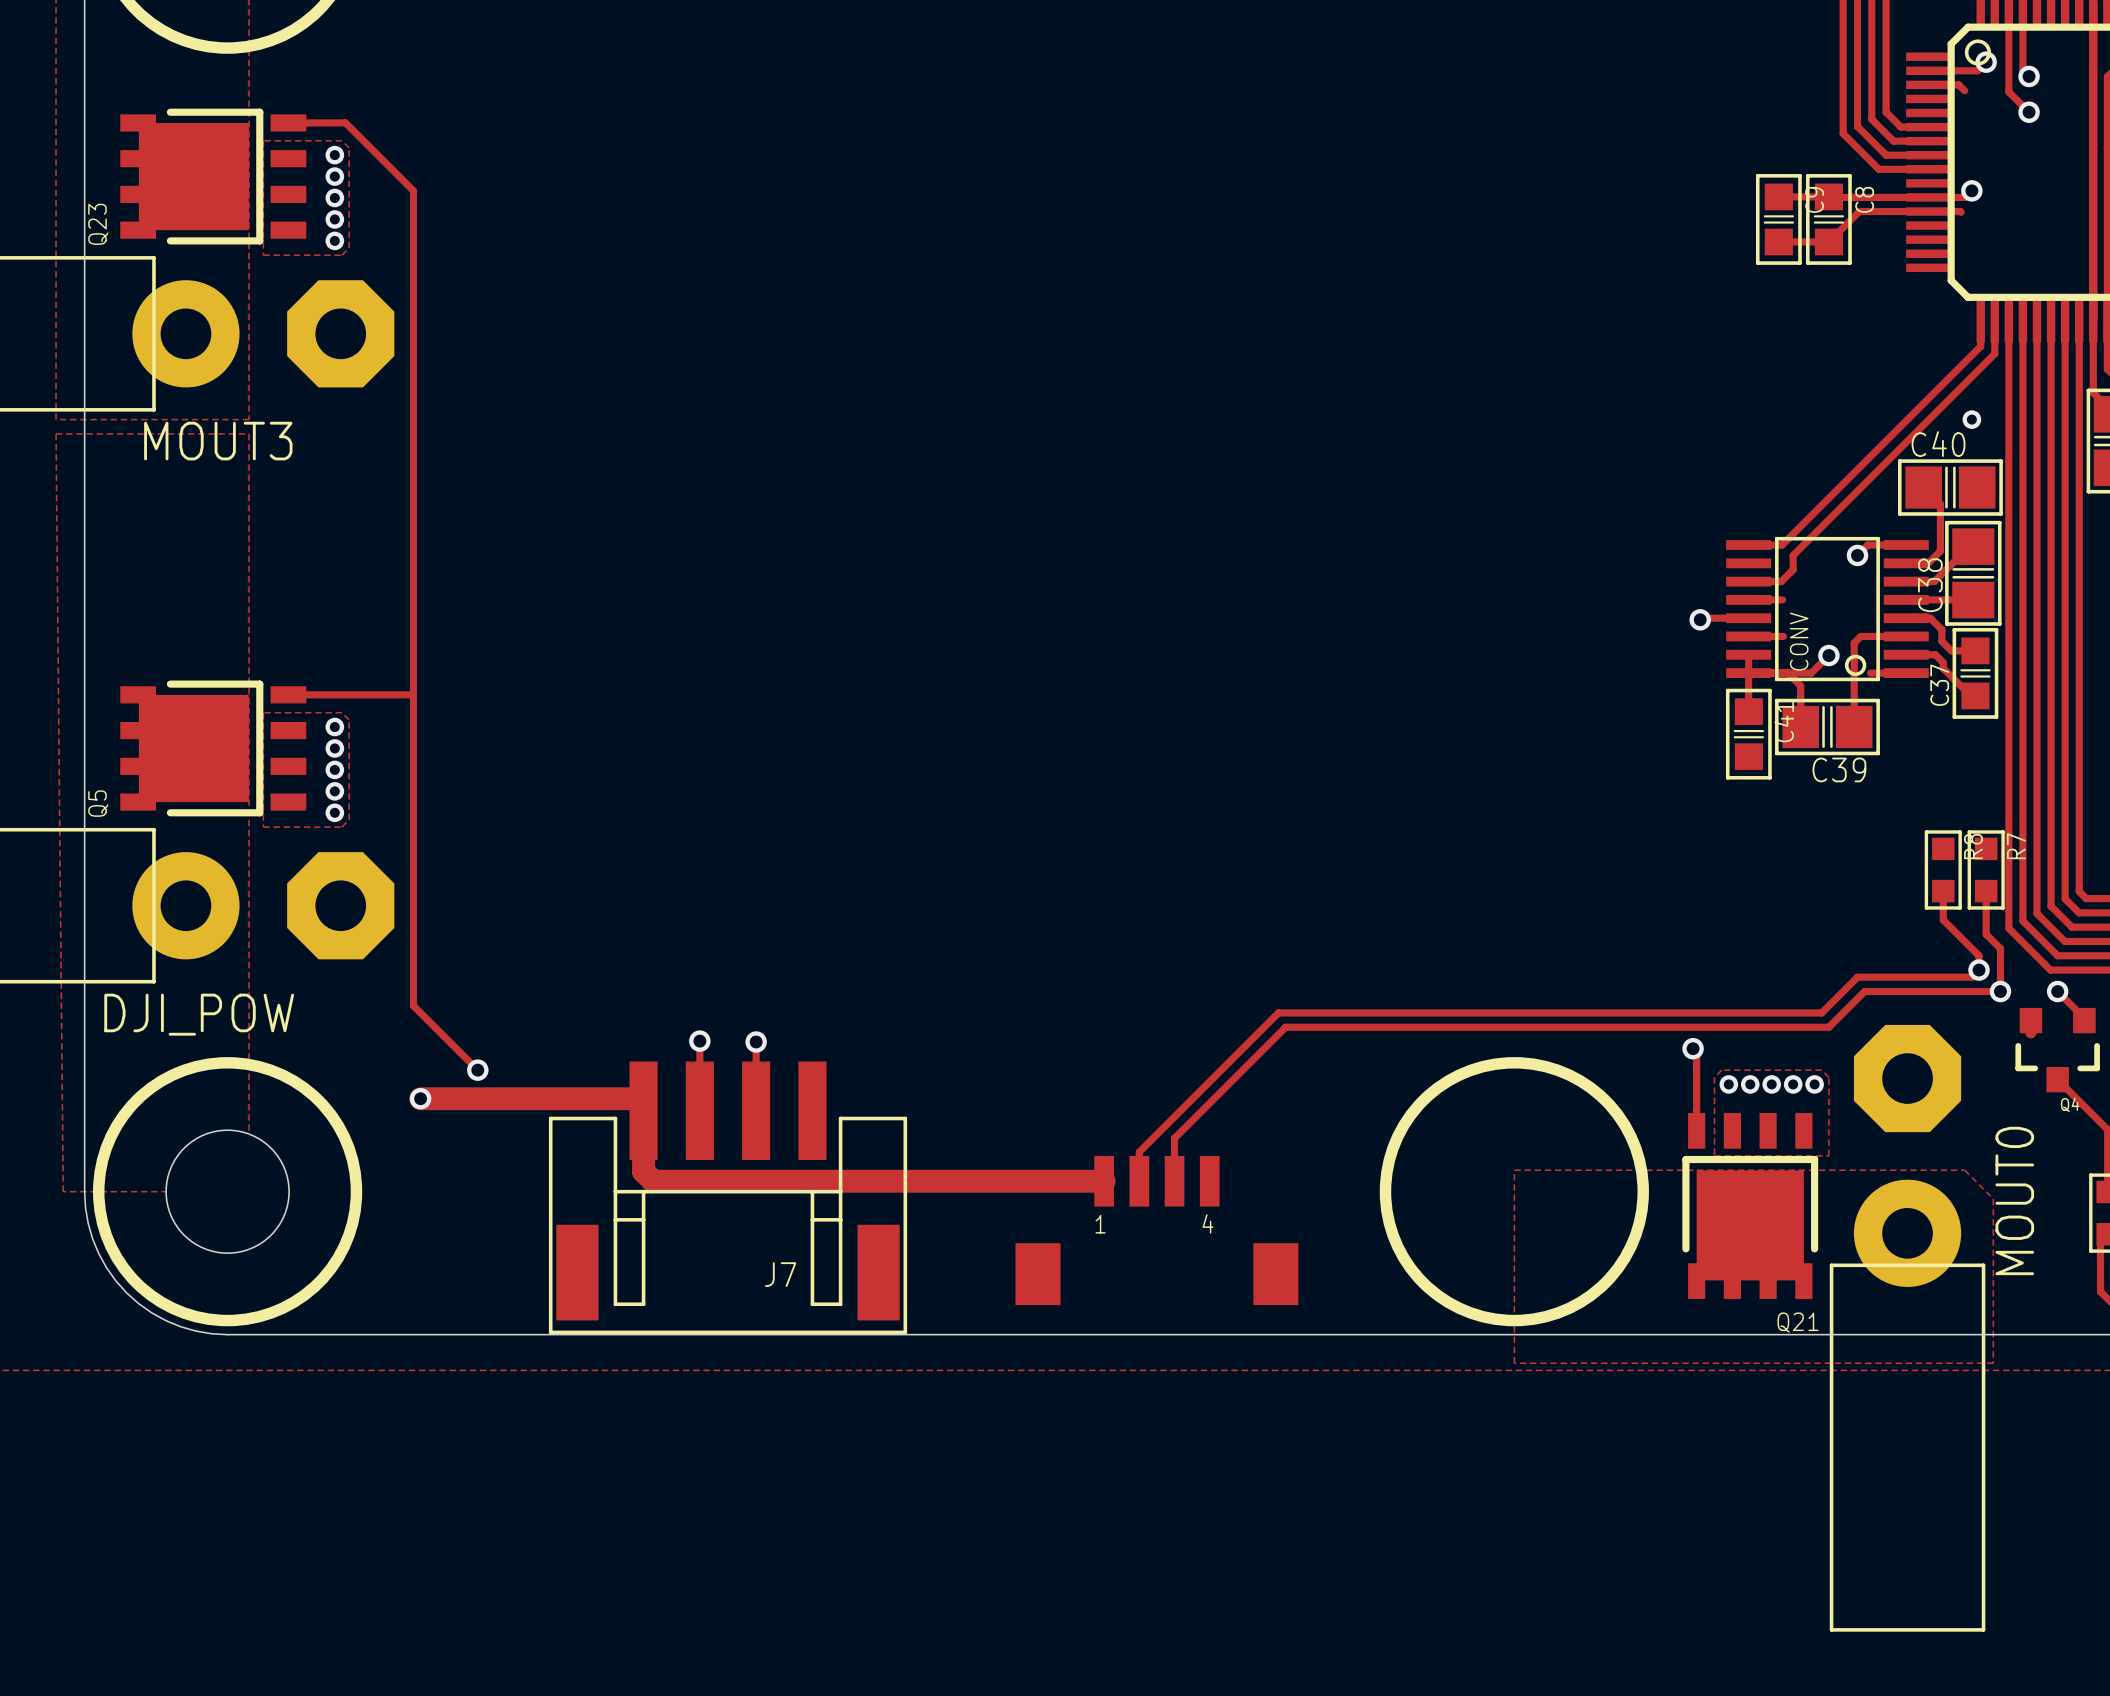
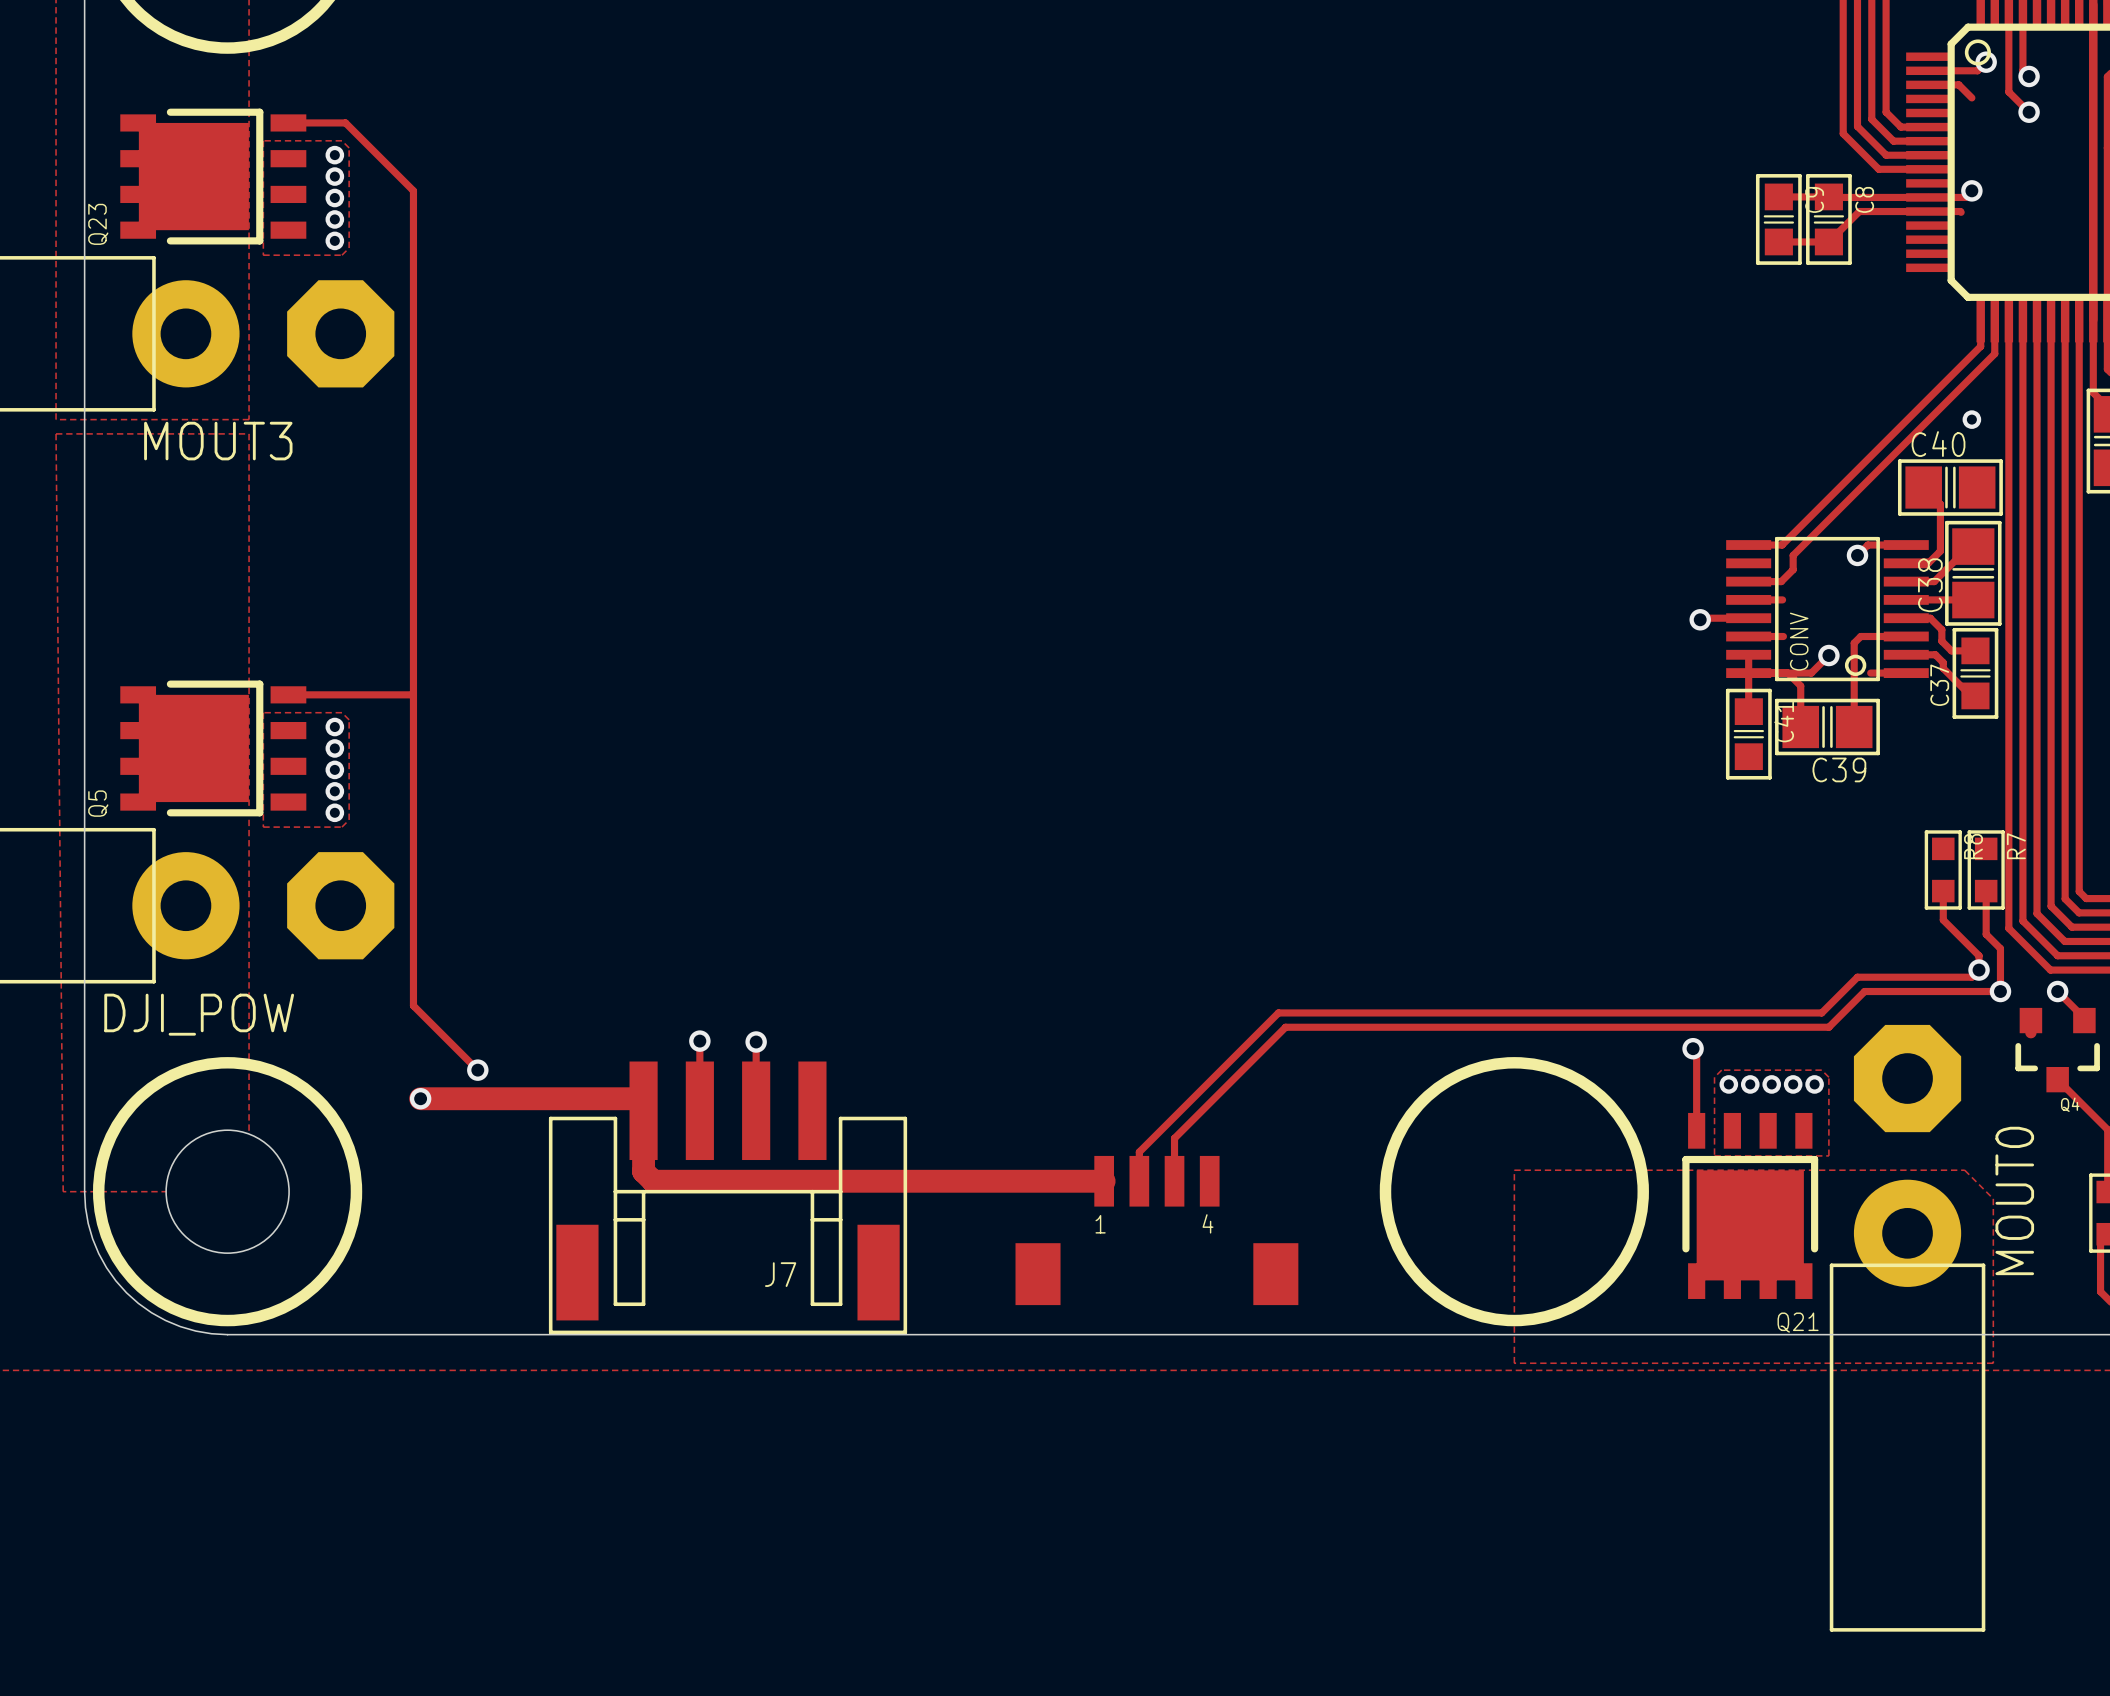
track: none -> (1964, 90) (1971, 97)

